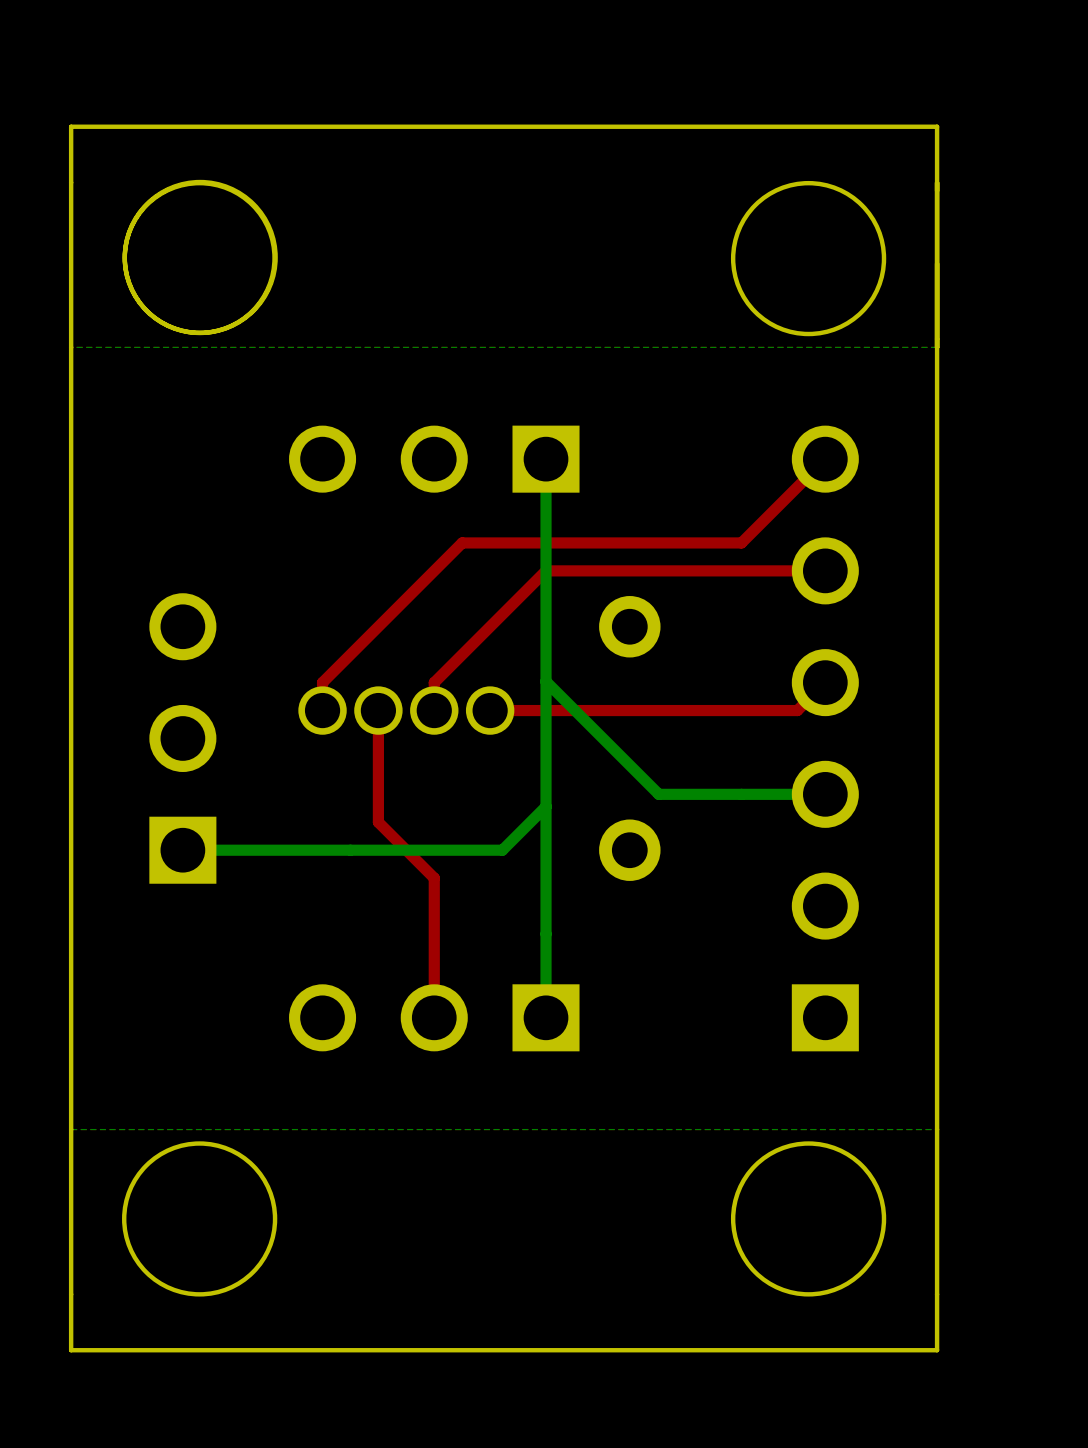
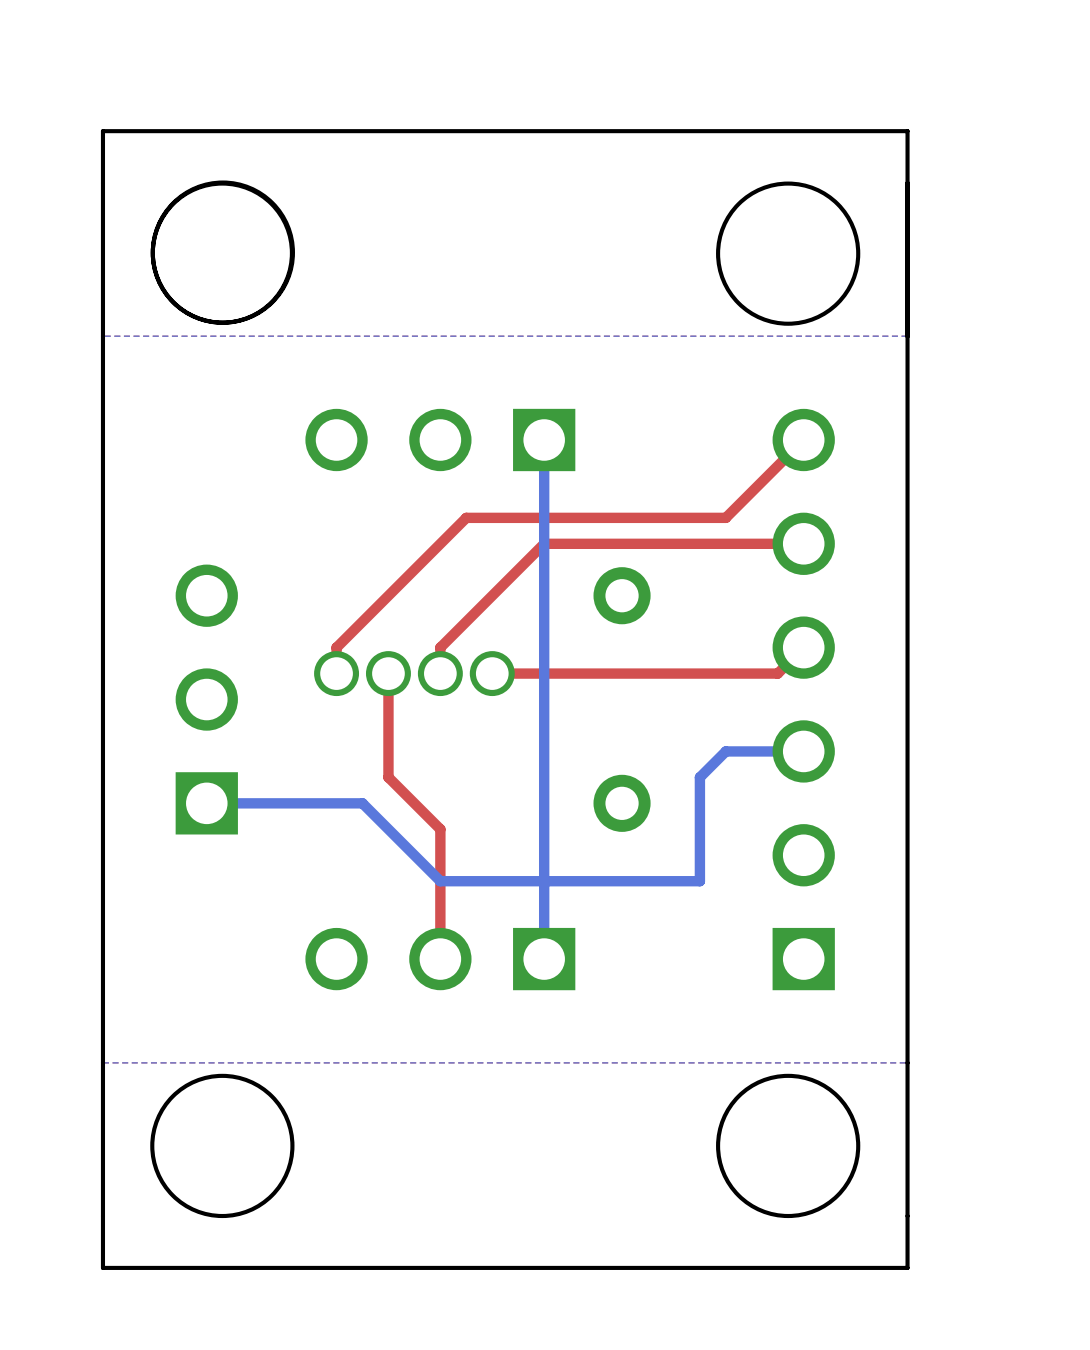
bottom track: (546, 681) (658, 794) (741, 794) -> none
bottom track: (546, 806) (502, 850) (350, 850) -> (725, 751) (699, 777) (699, 881) (440, 881) (362, 803)

